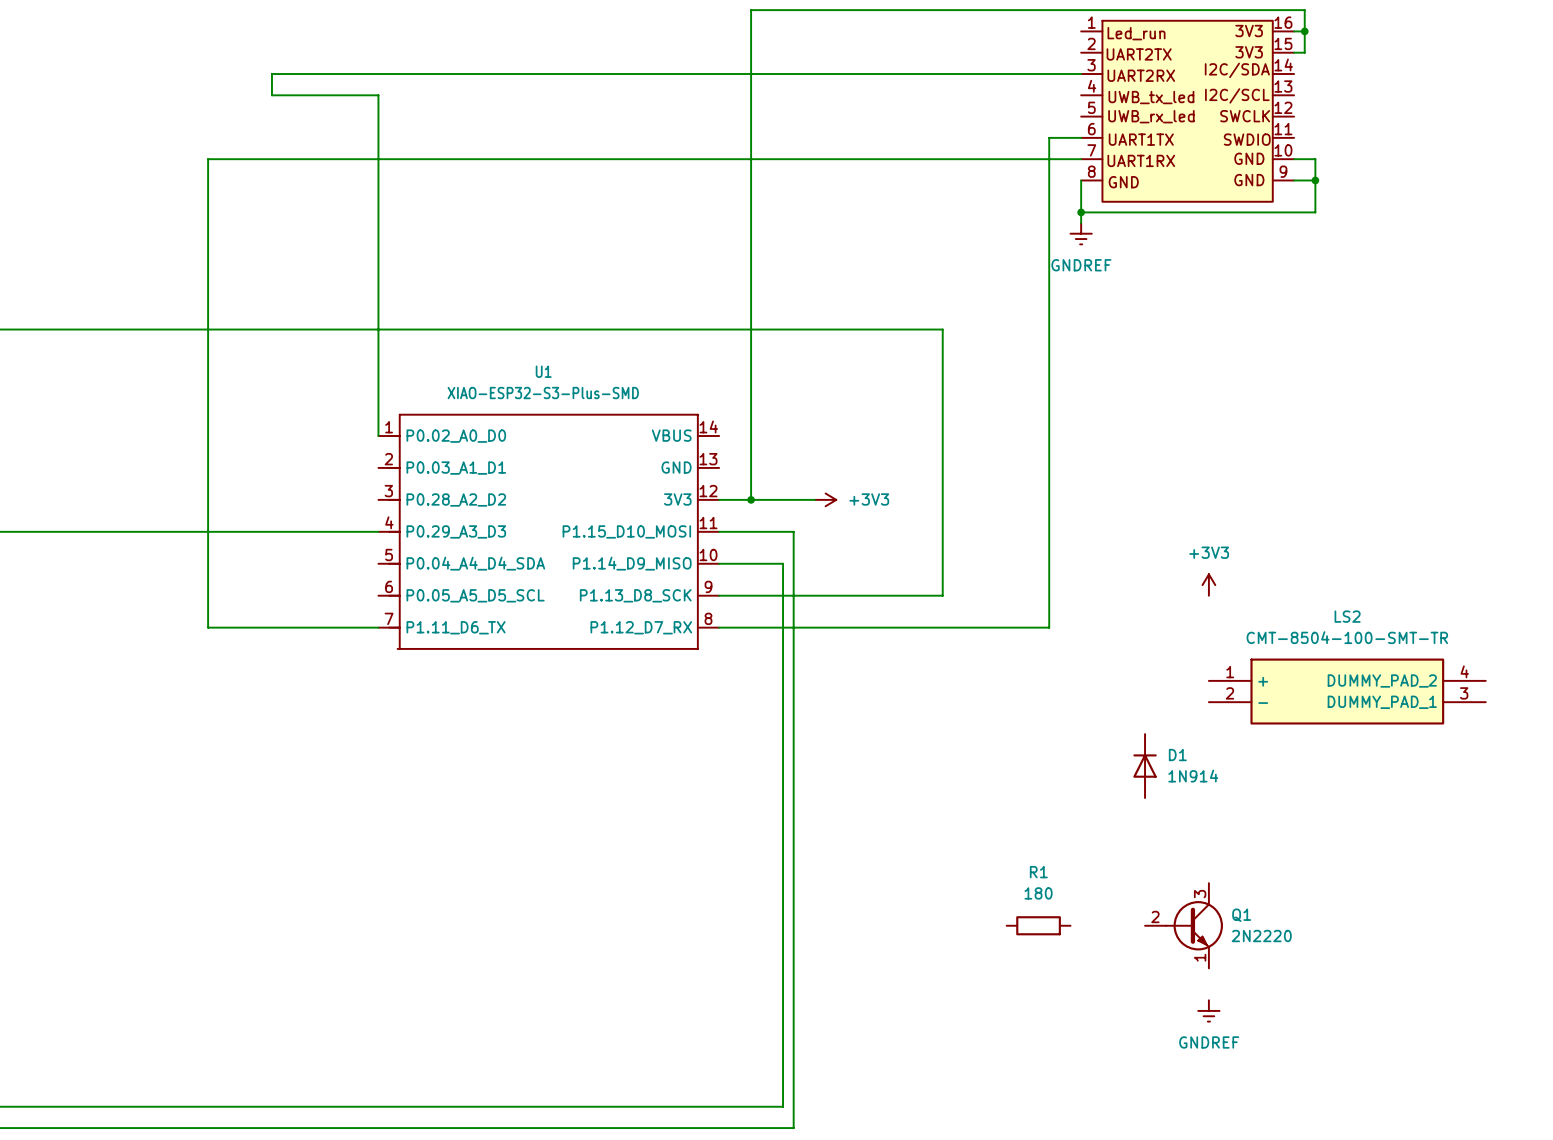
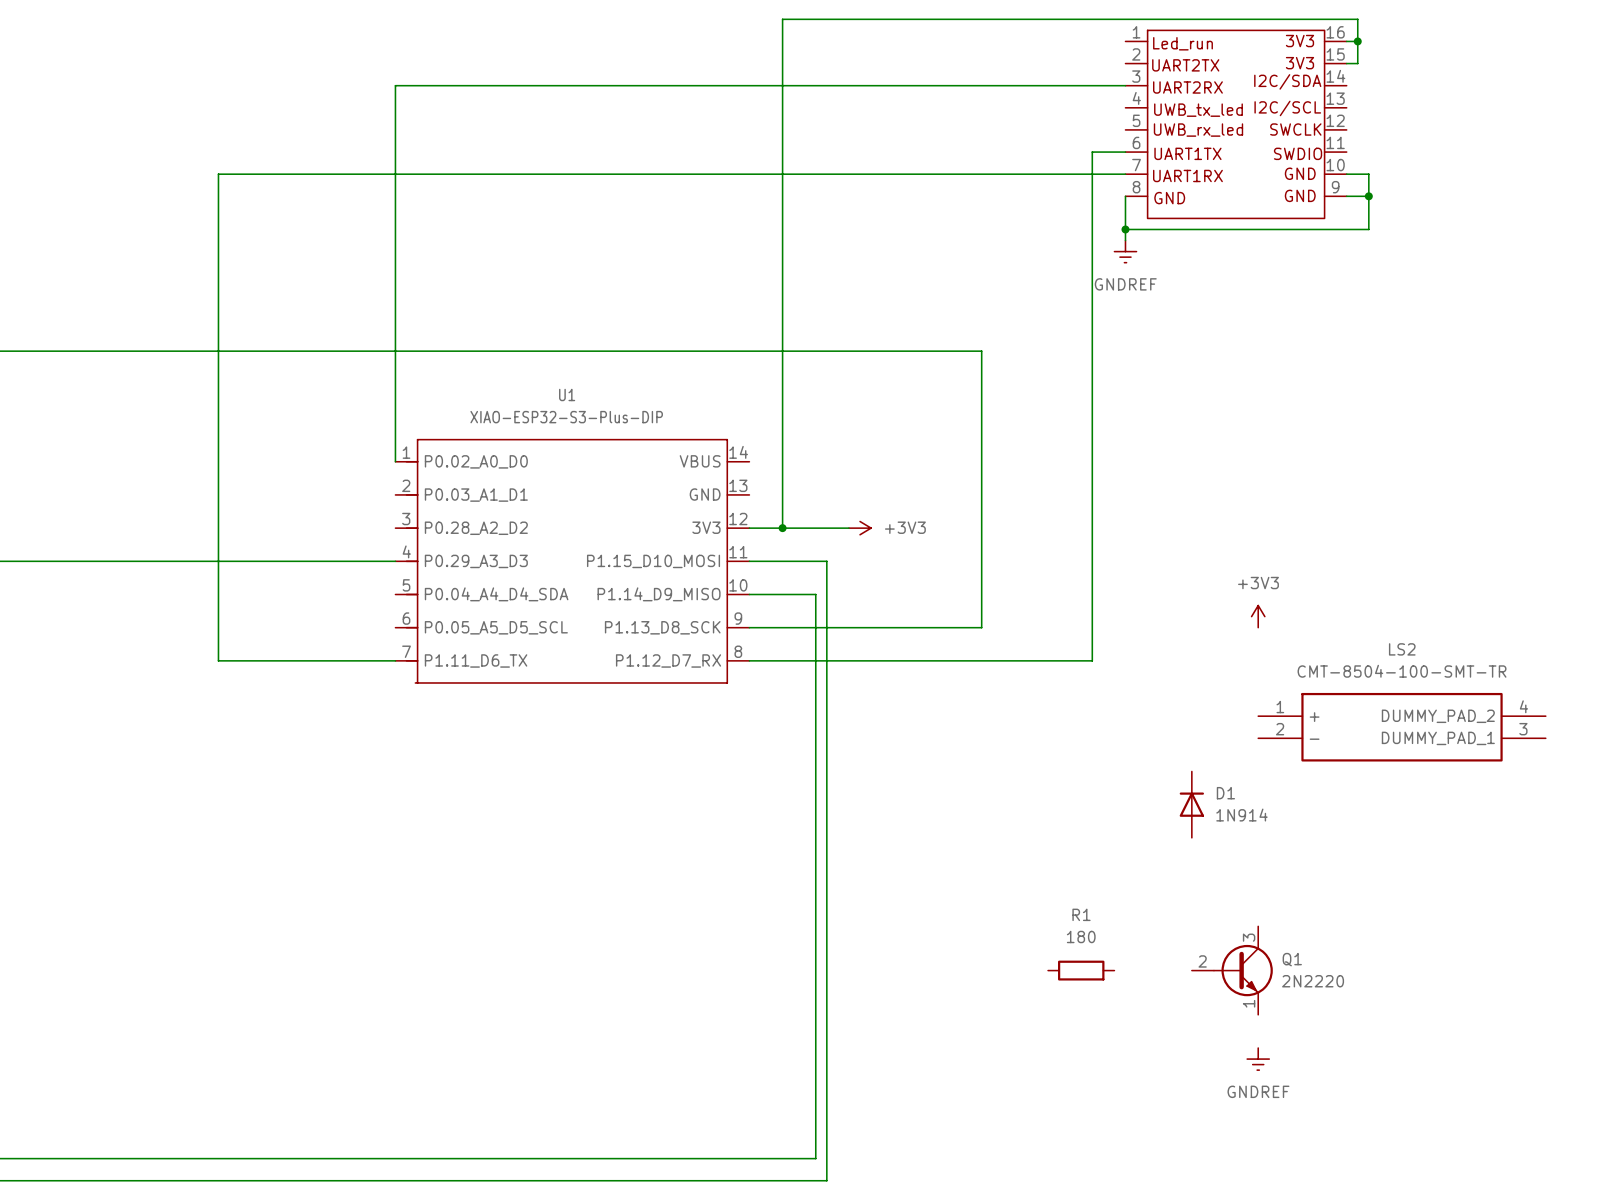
wire: (378, 74) (271, 74) (271, 95) (378, 95) -> (395, 85) (395, 107)
U1 value: XIAO-ESP32-S3-Plus-SMD (543, 393) -> XIAO-ESP32-S3-Plus-DIP (566, 417)

